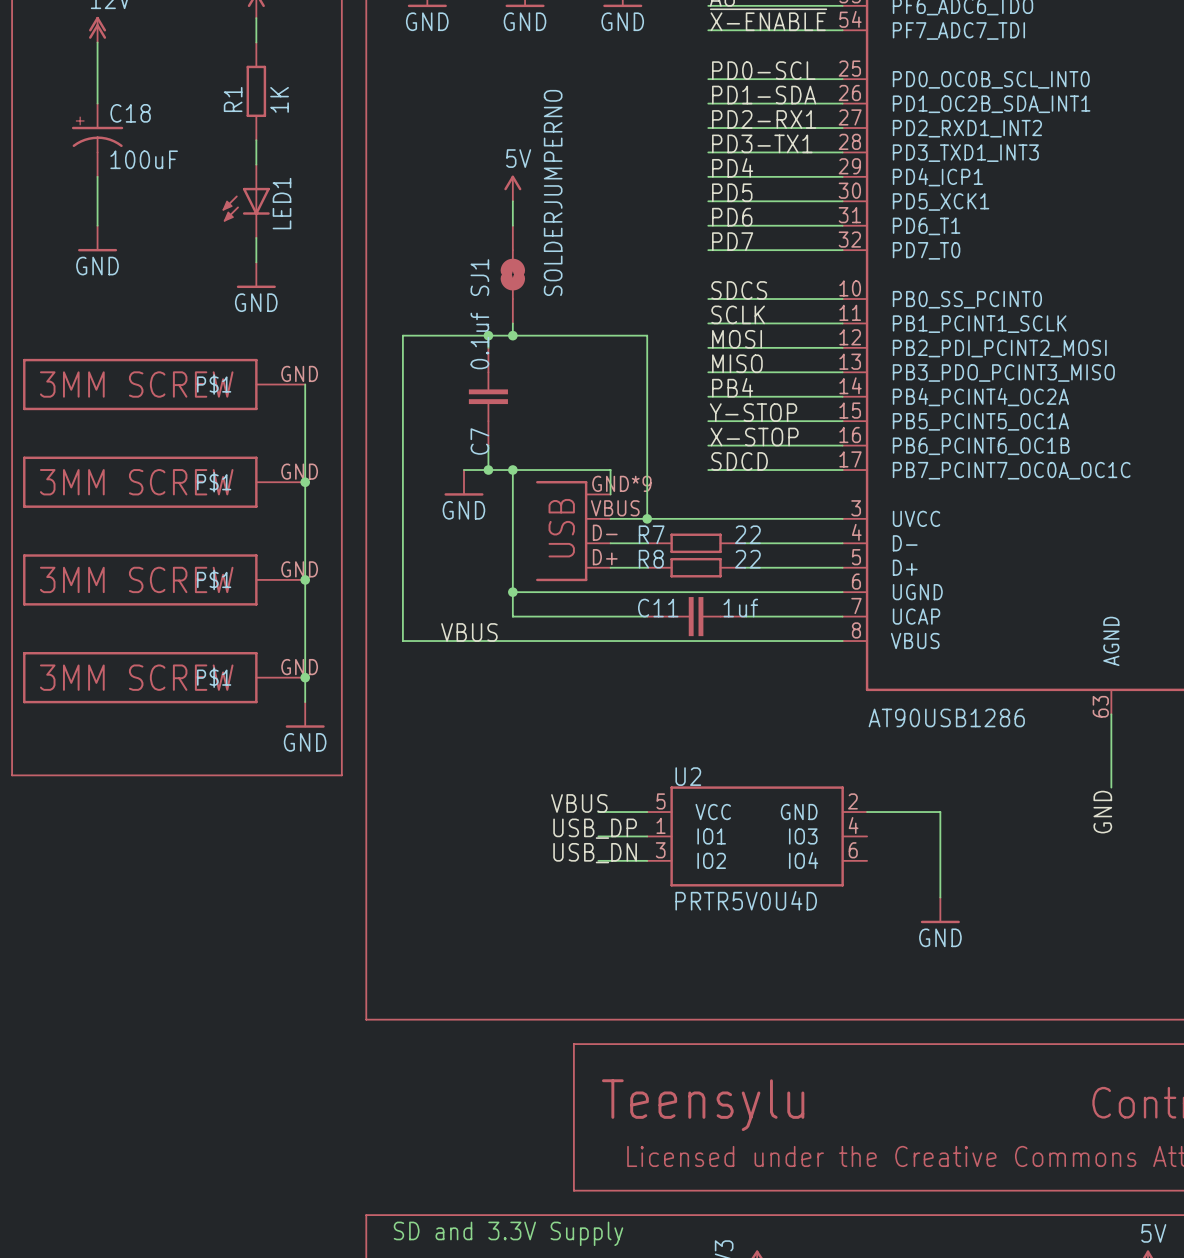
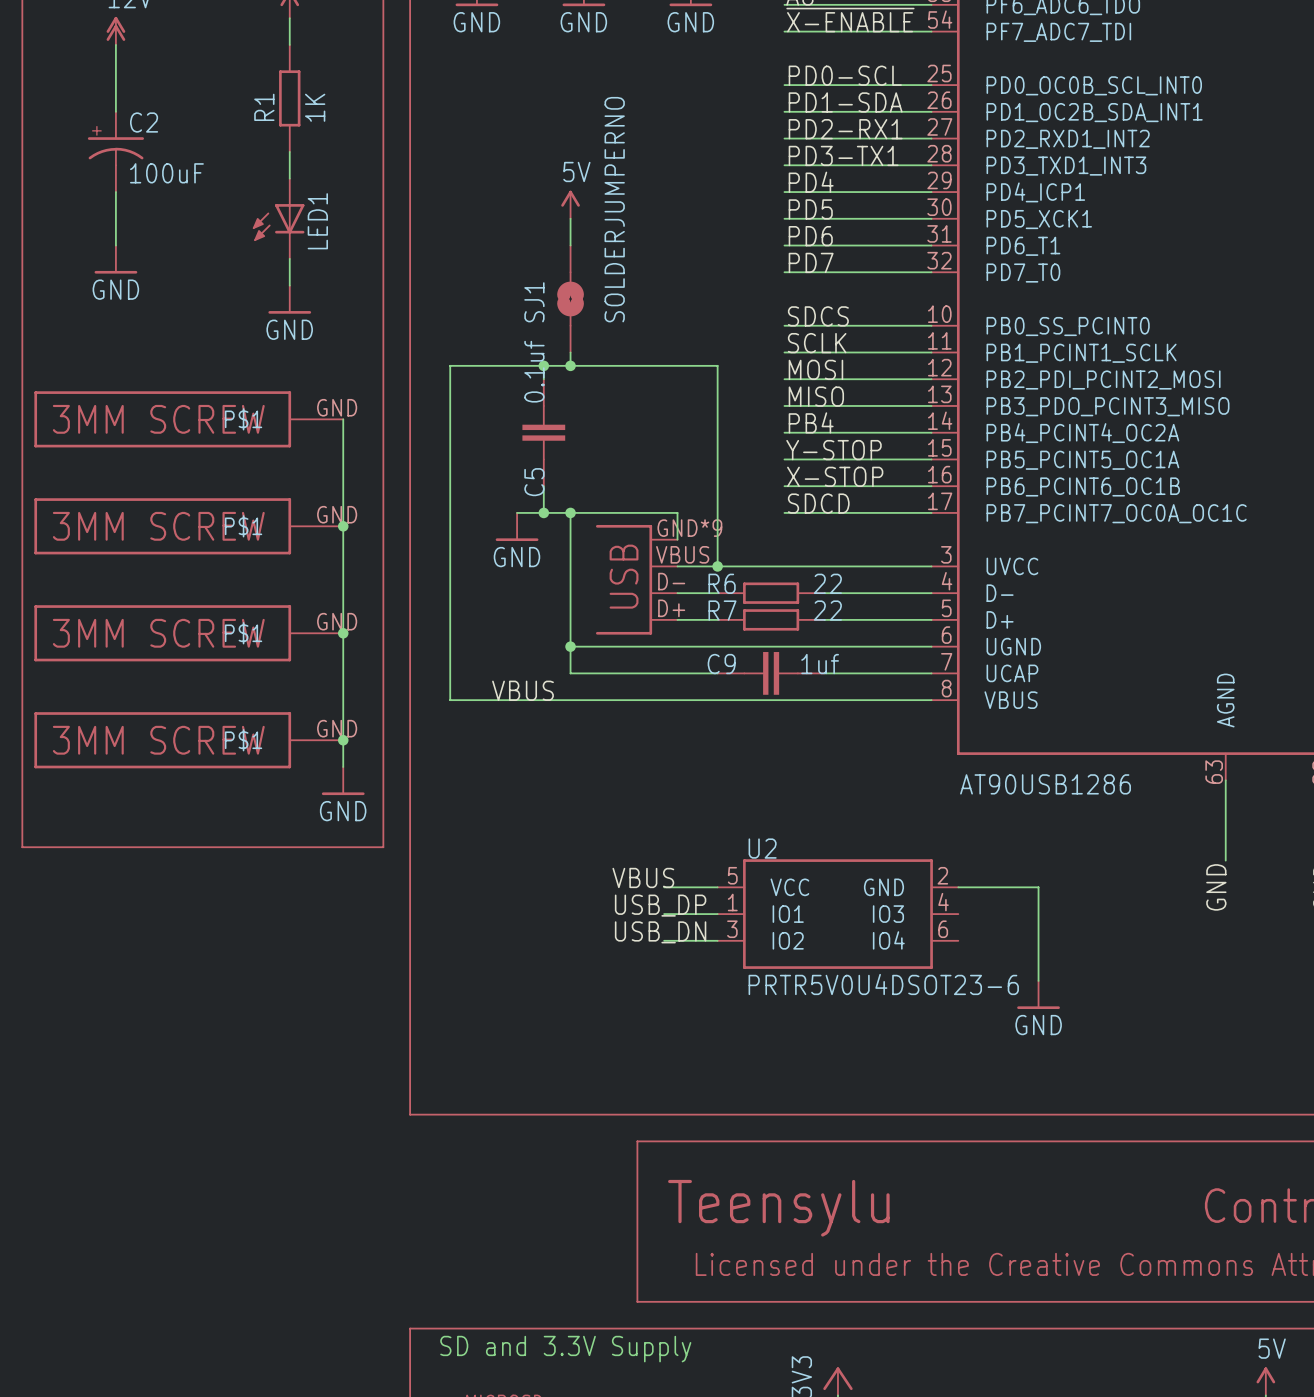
C18 name: C18 (130, 113) -> C2 (144, 122)
C7 name: C7 (479, 441) -> C5 (534, 482)
R7 name: R7 (651, 534) -> R6 (722, 583)
R8 name: R8 (651, 559) -> R7 (722, 610)
C11 name: C11 (658, 608) -> C9 (721, 664)
U2 value: PRTR5V0U4D (746, 900) -> PRTR5V0U4DSOT23-6 (883, 984)

